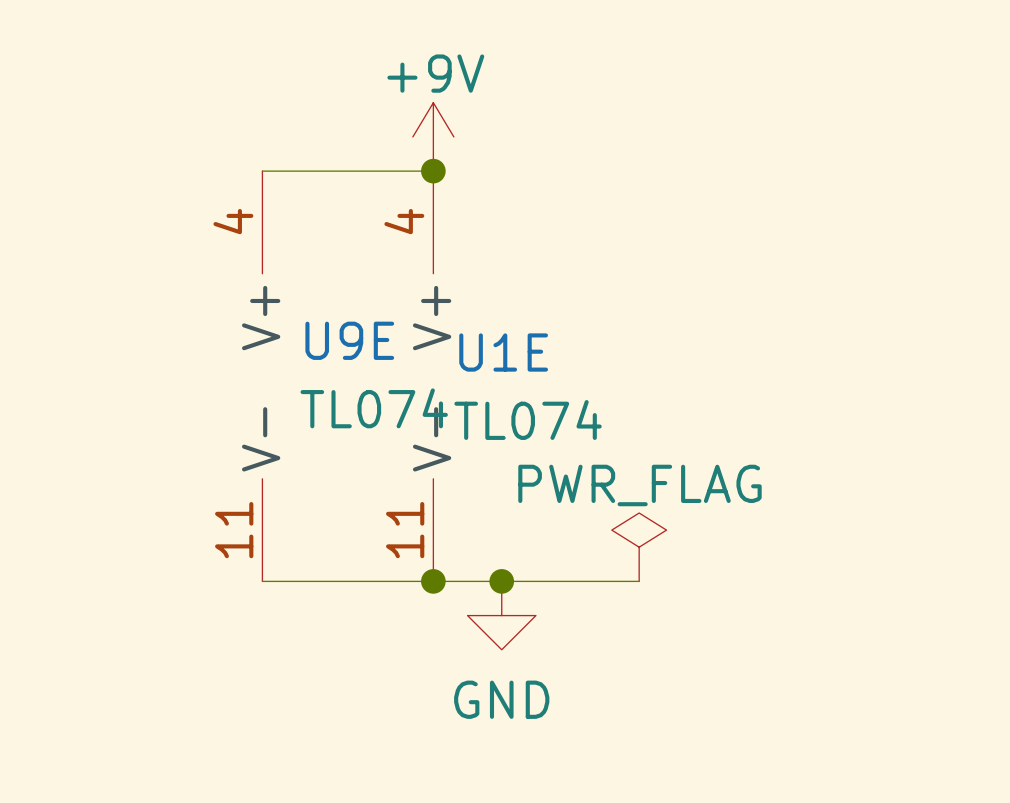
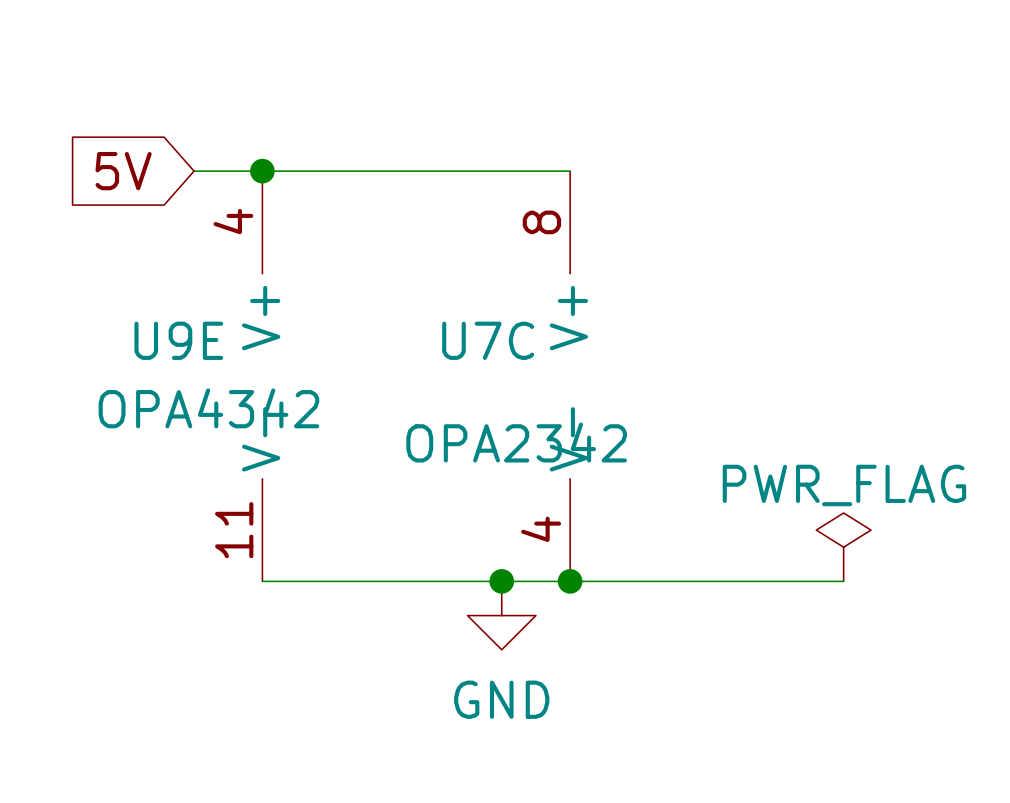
power symbol: +9V (433, 136) -> none
global label: none -> 5V (123, 171)
wire: none -> (194, 171) (262, 171)
junction: none -> (262, 171)
wire: none -> (433, 171) (570, 171)
junction: (433, 171) -> none
U9E name position: U9E (349, 340) -> U9E (178, 340)
U1E: TL074 (433, 376) -> none
U7C: none -> OPA2342 (570, 376)
U9E value: TL074 (374, 408) -> OPA4342 (208, 408)
power symbol position: PWR_FLAG (639, 547) -> PWR_FLAG (843, 547)
junction position: (433, 581) -> (570, 581)
wire: none -> (639, 581) (843, 581)

